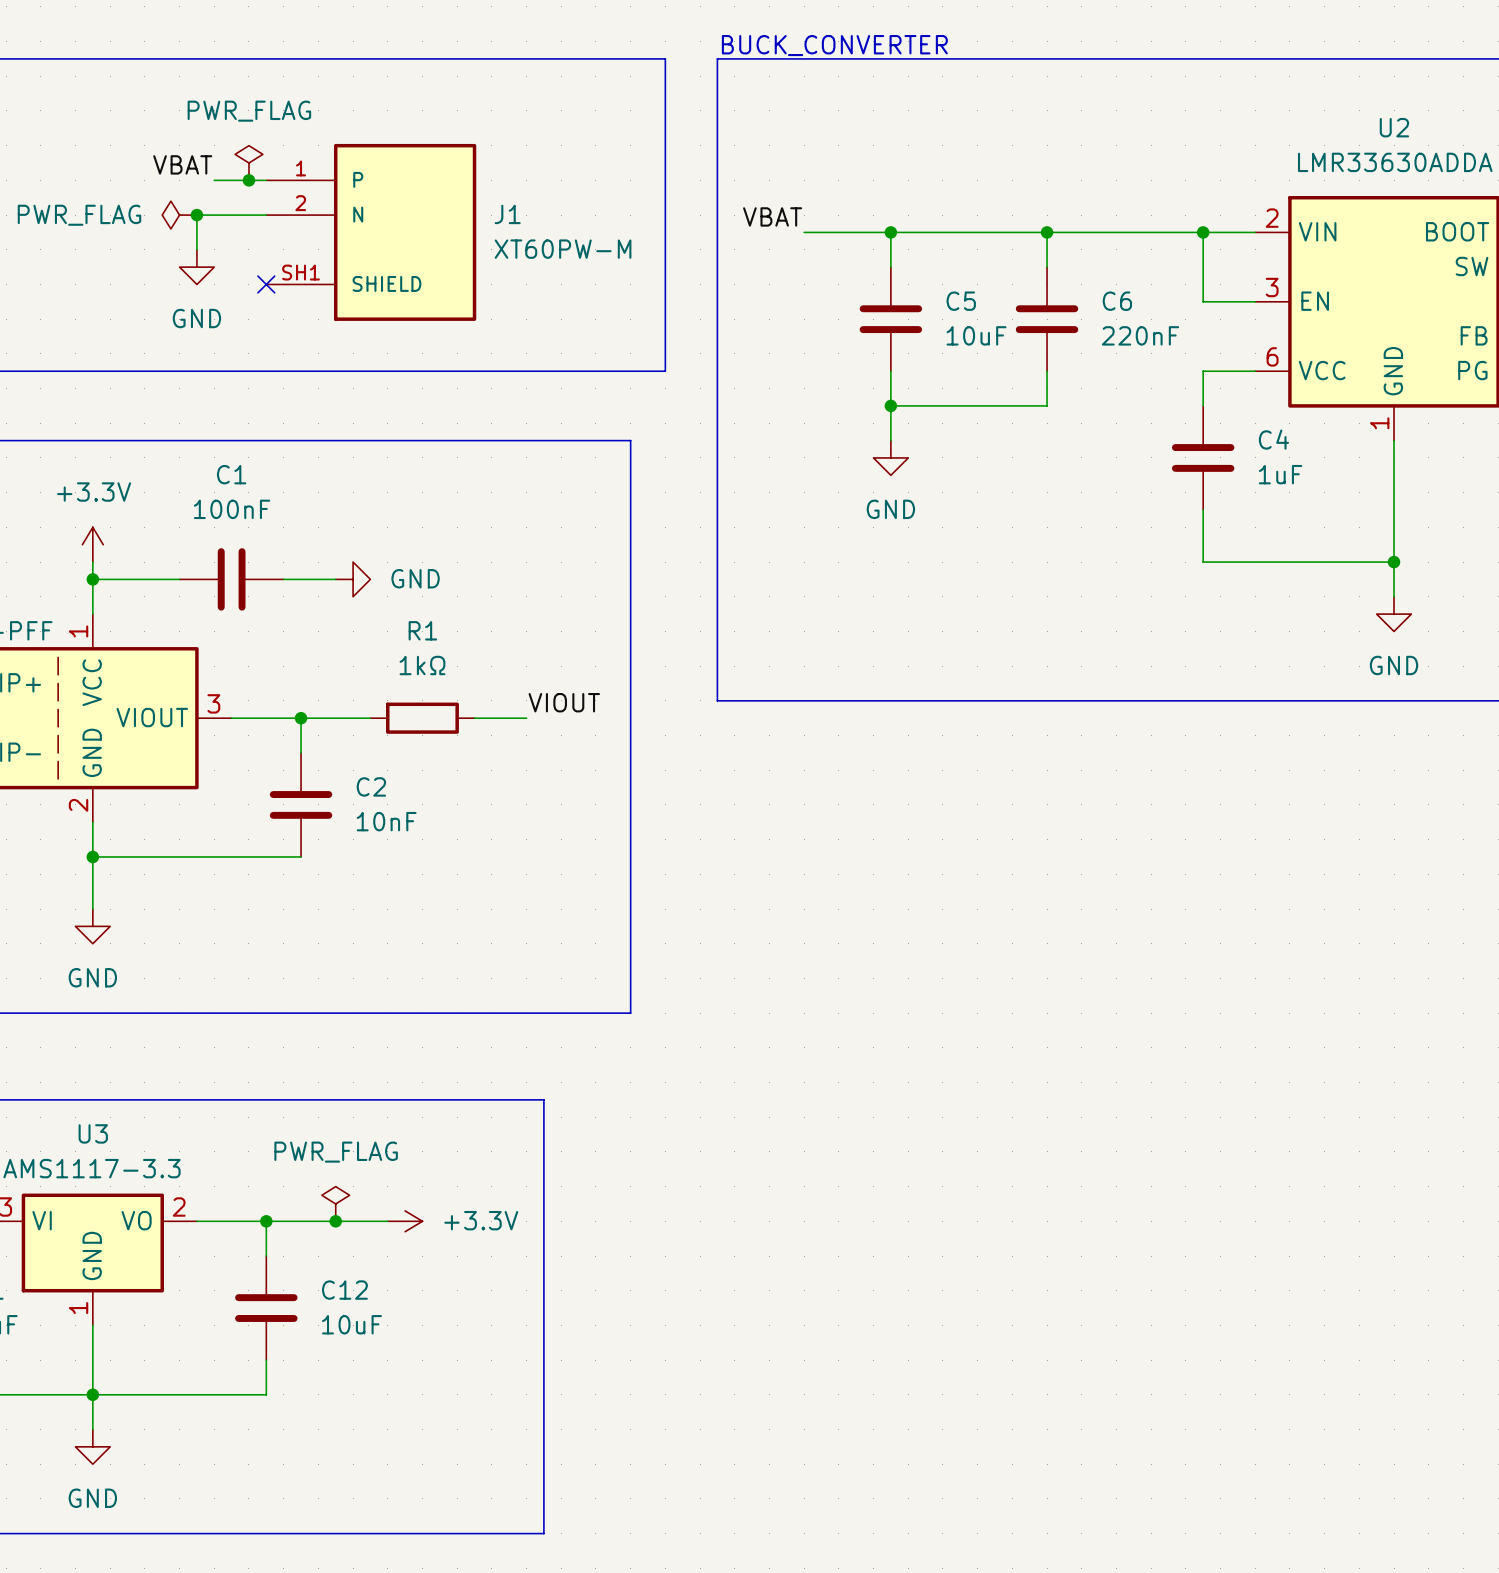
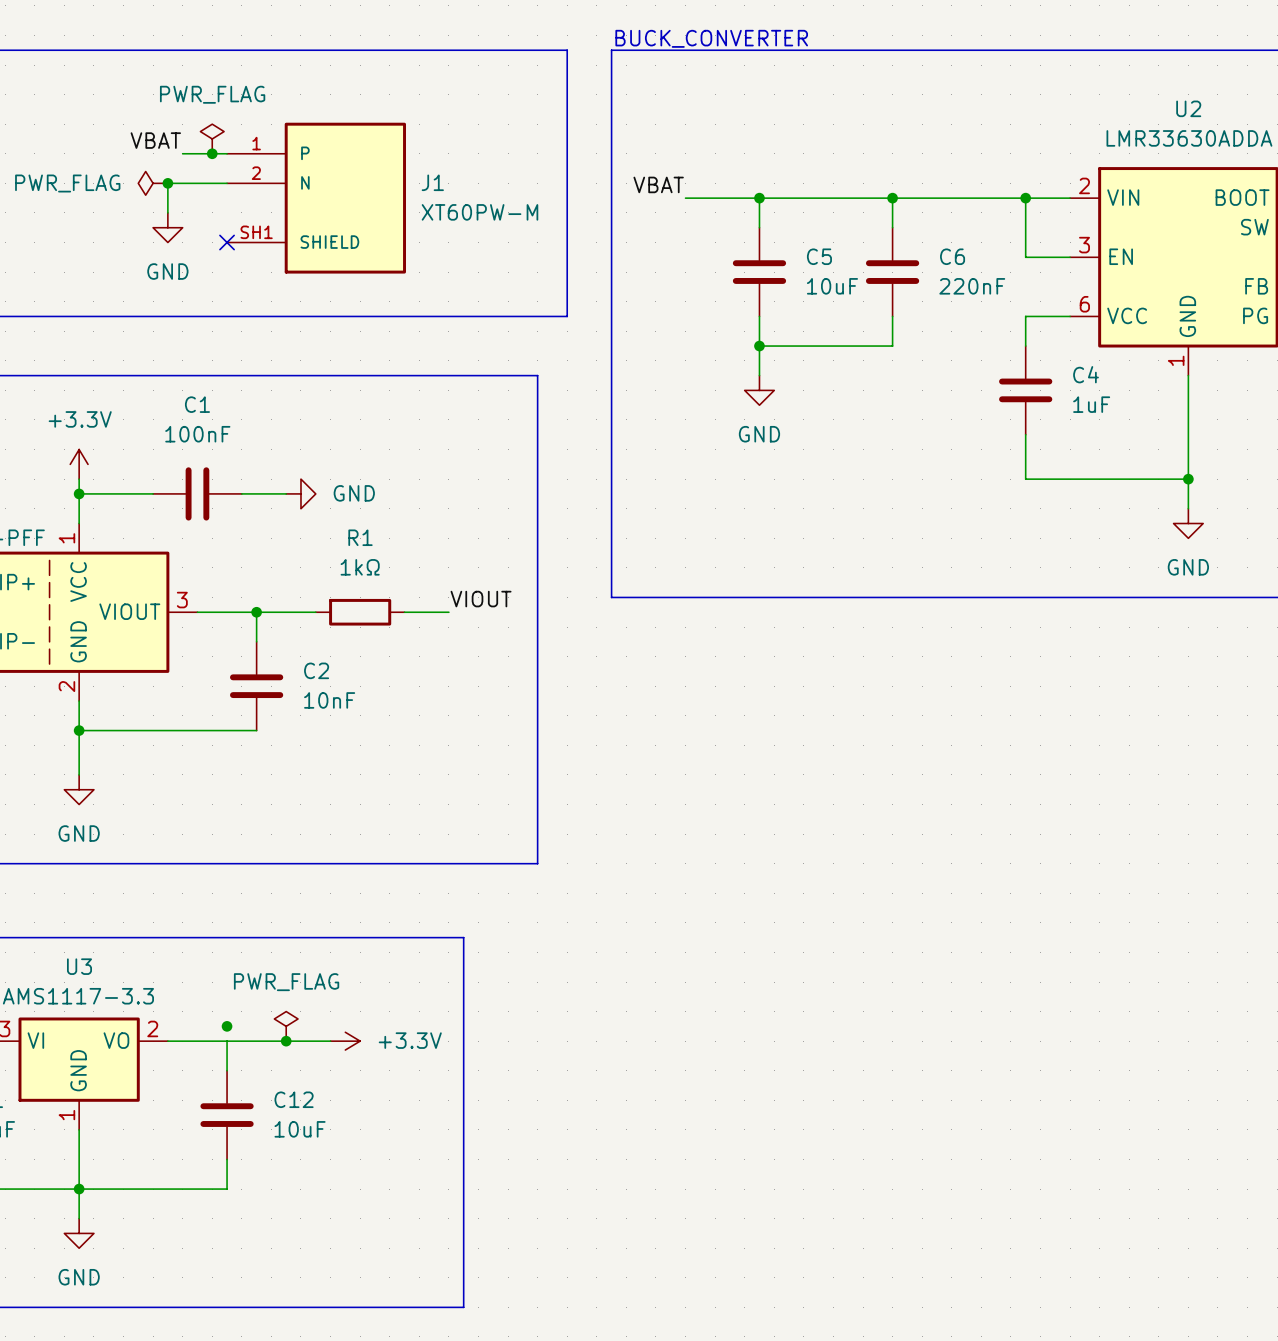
junction position: (266, 1221) -> (227, 1026)

